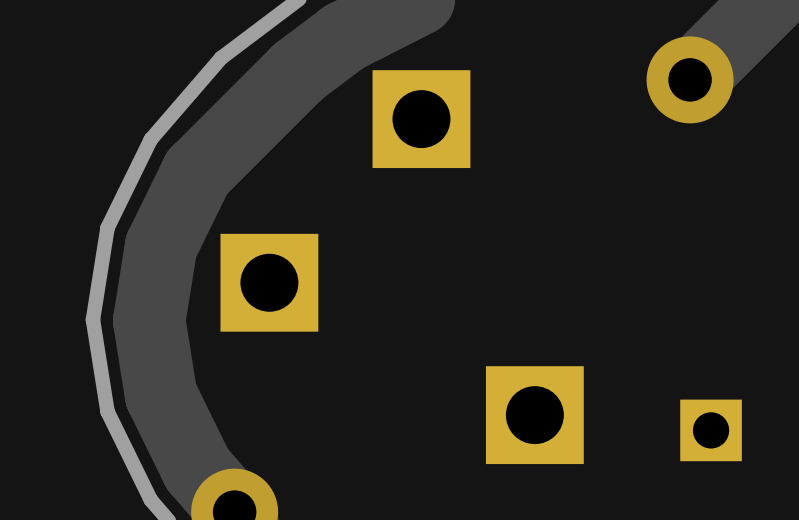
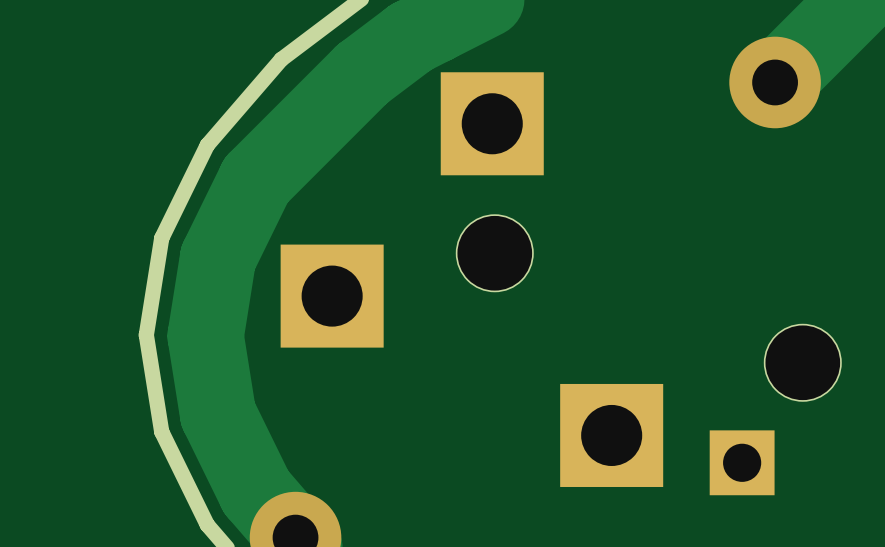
part: none -> (494, 253)
part: none -> (802, 362)
part position: (711, 430) -> (742, 462)

